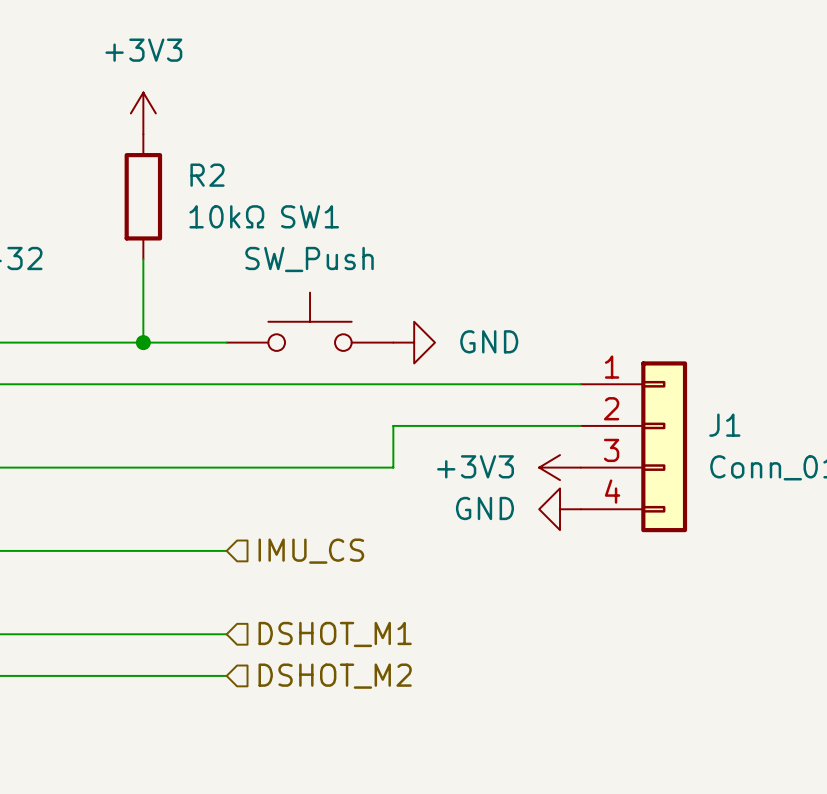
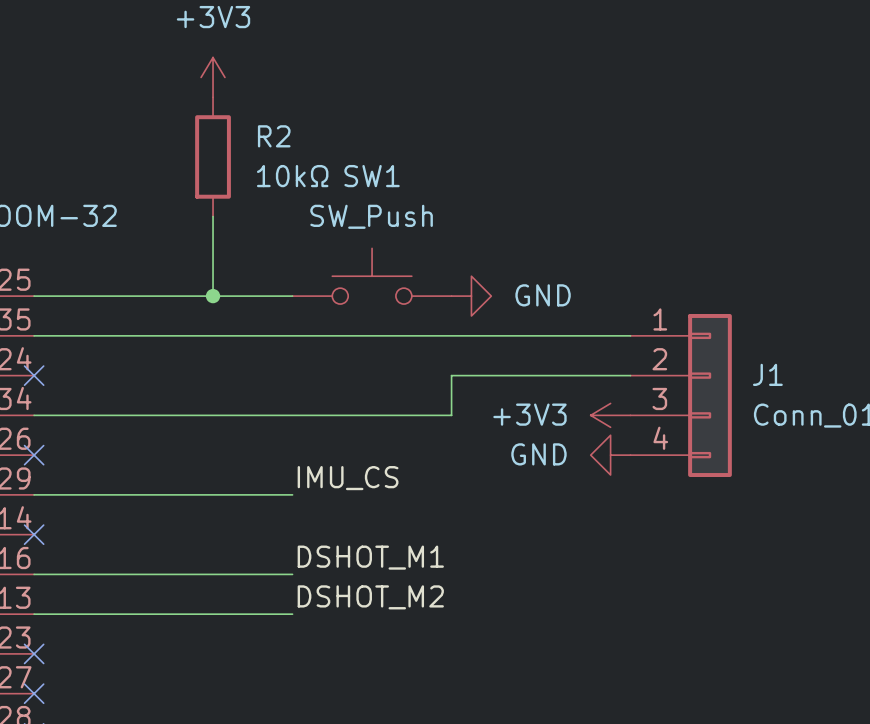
label: none -> IMU_CS (348, 478)
hierarchical label: IMU_CS (311, 551) -> none
label: none -> DSHOT_M1 (370, 557)
hierarchical label: DSHOT_M1 (335, 634) -> none
label: none -> DSHOT_M2 (370, 597)
hierarchical label: DSHOT_M2 (335, 676) -> none

